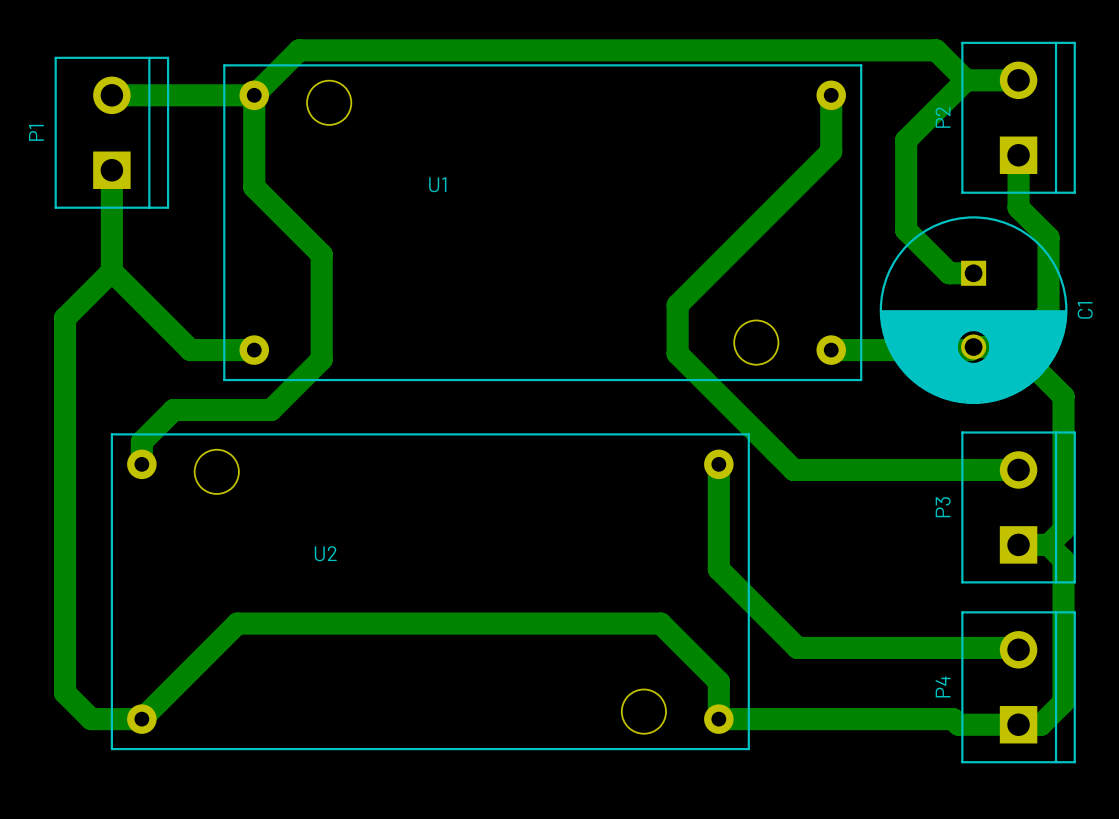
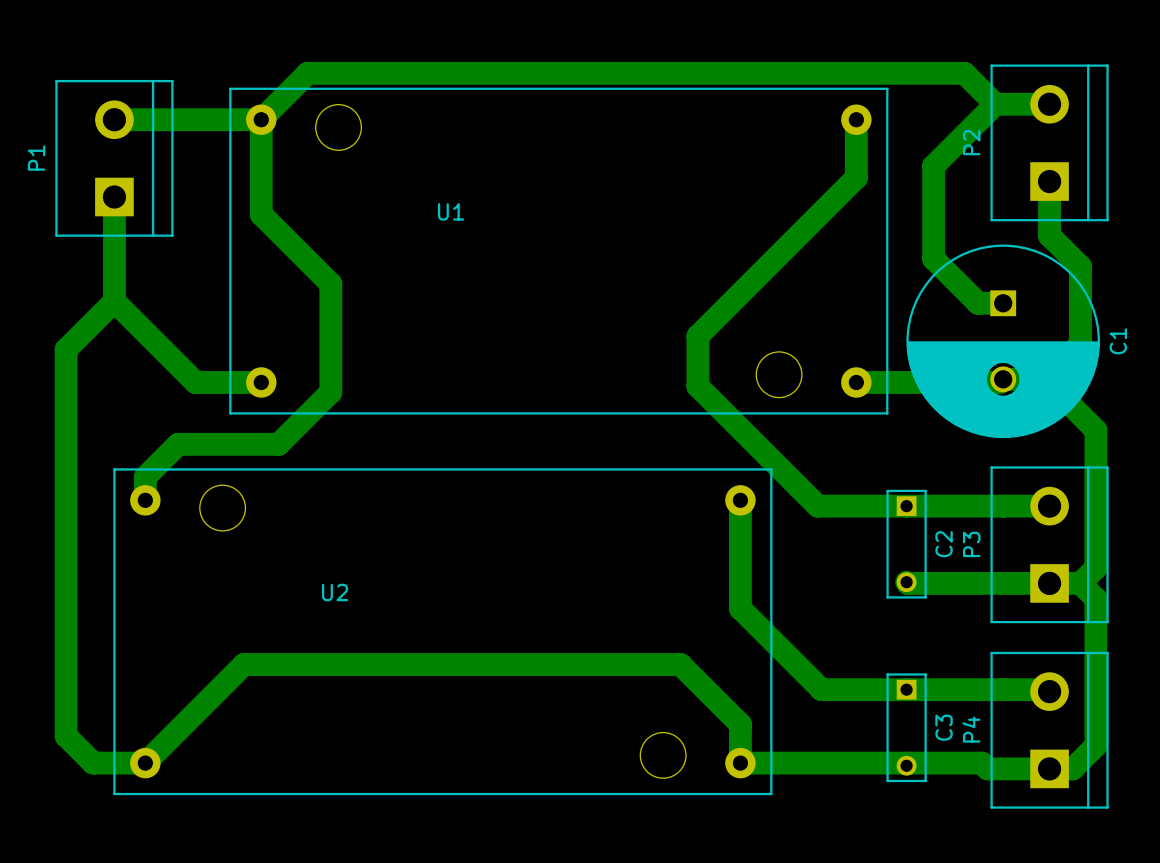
C2: none -> (906, 544)
bottom track: none -> (906, 582) (1049, 583)
C3: none -> (906, 727)

